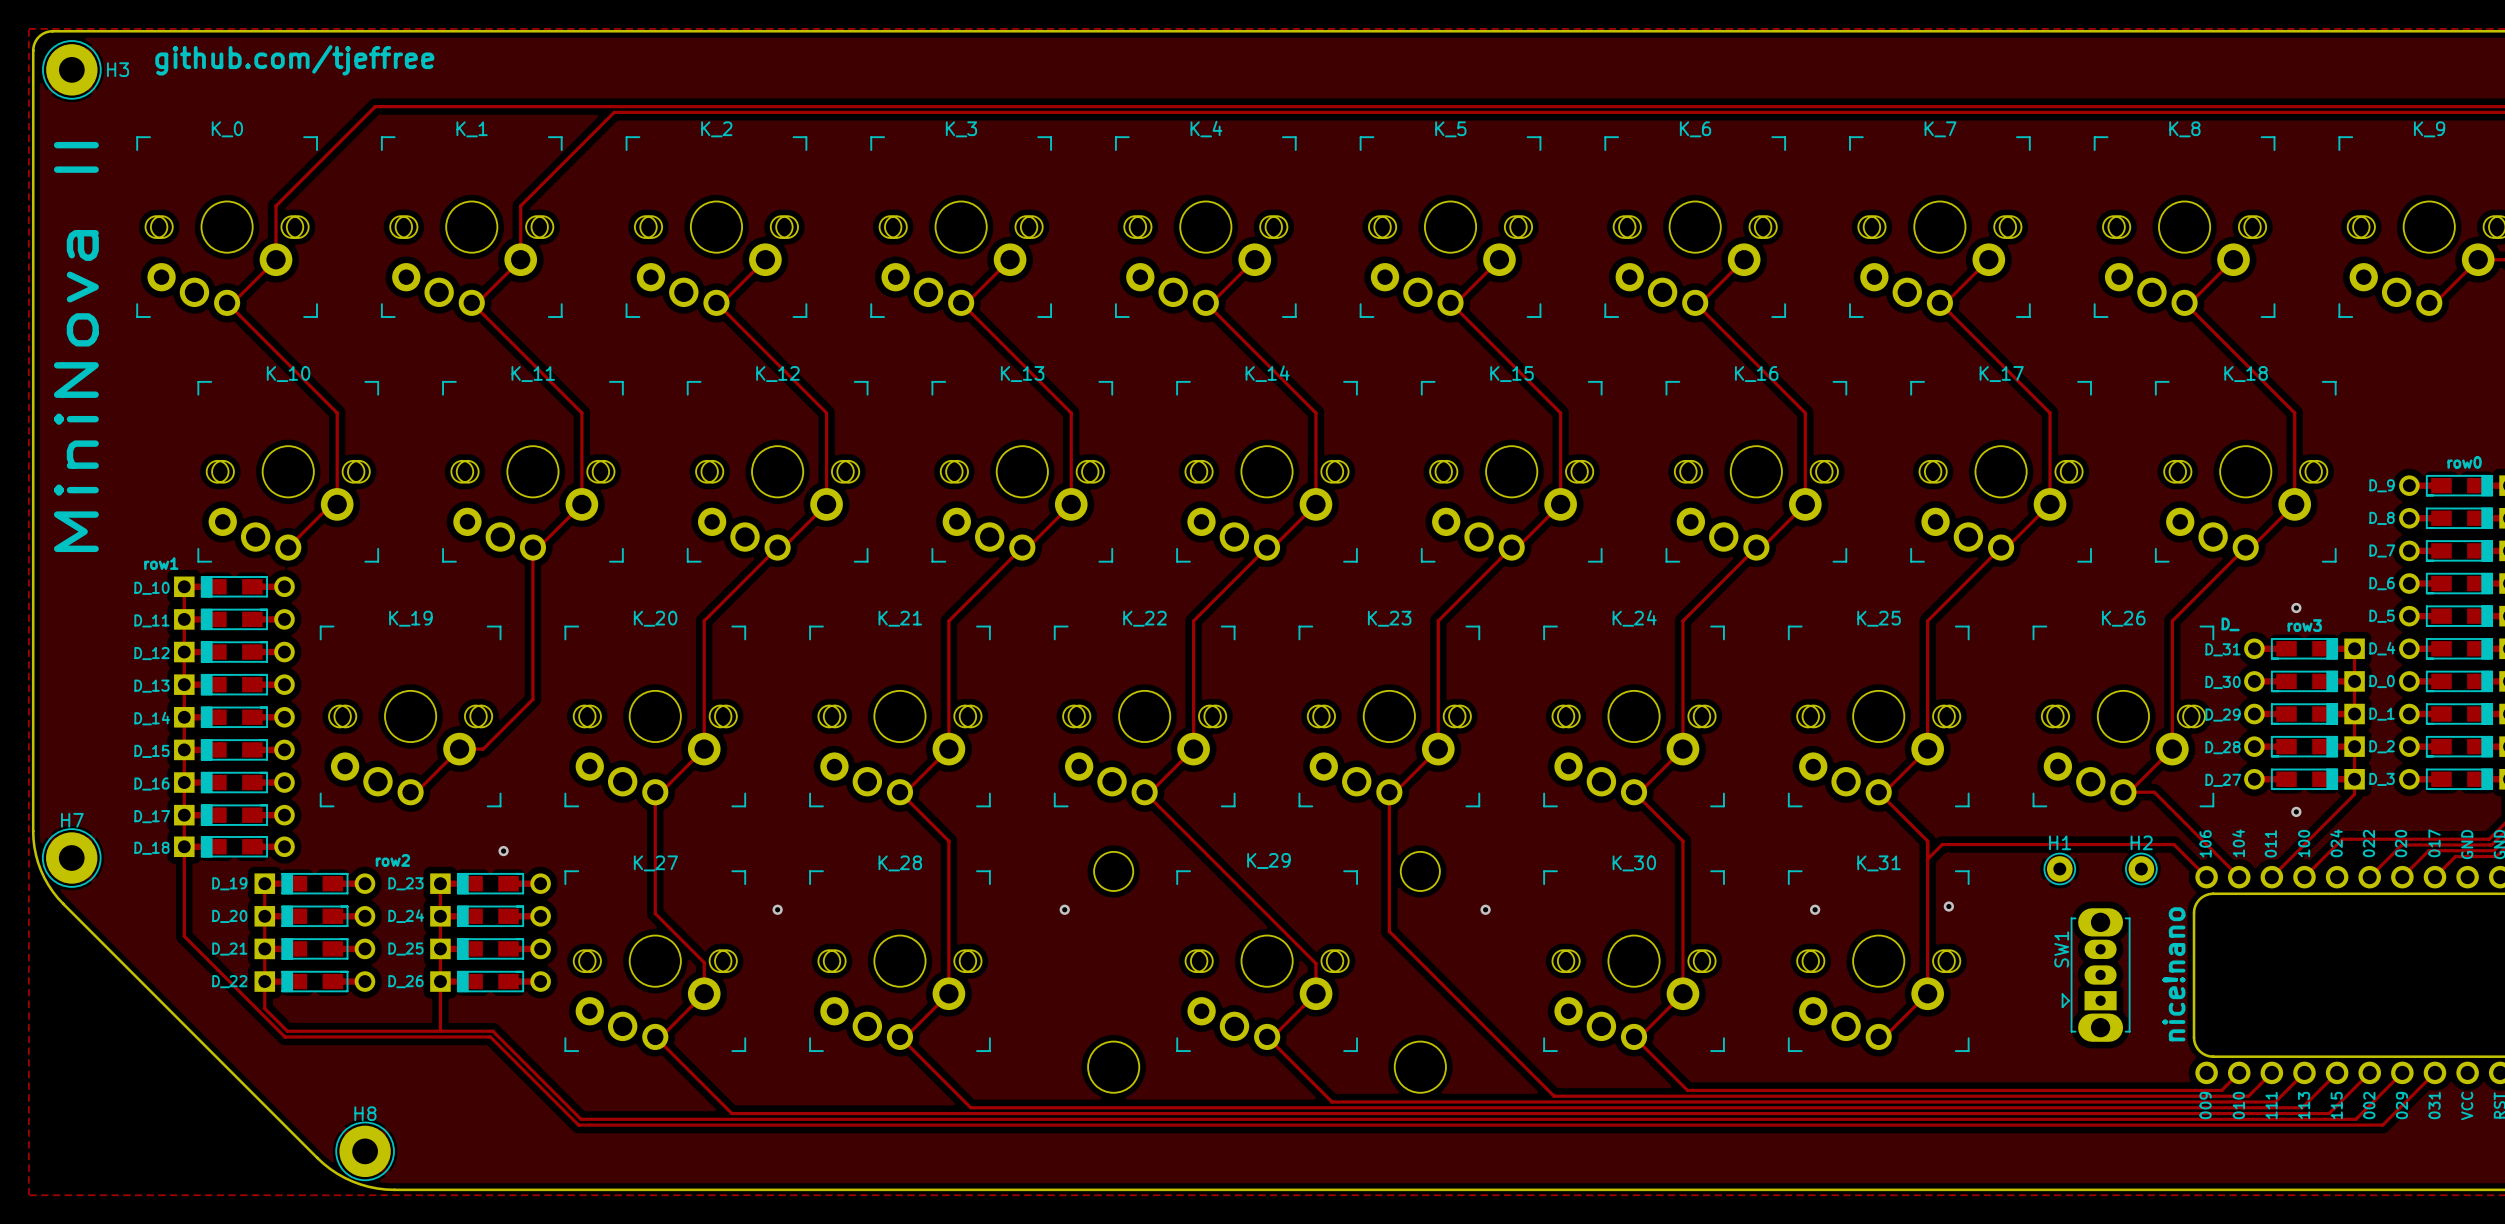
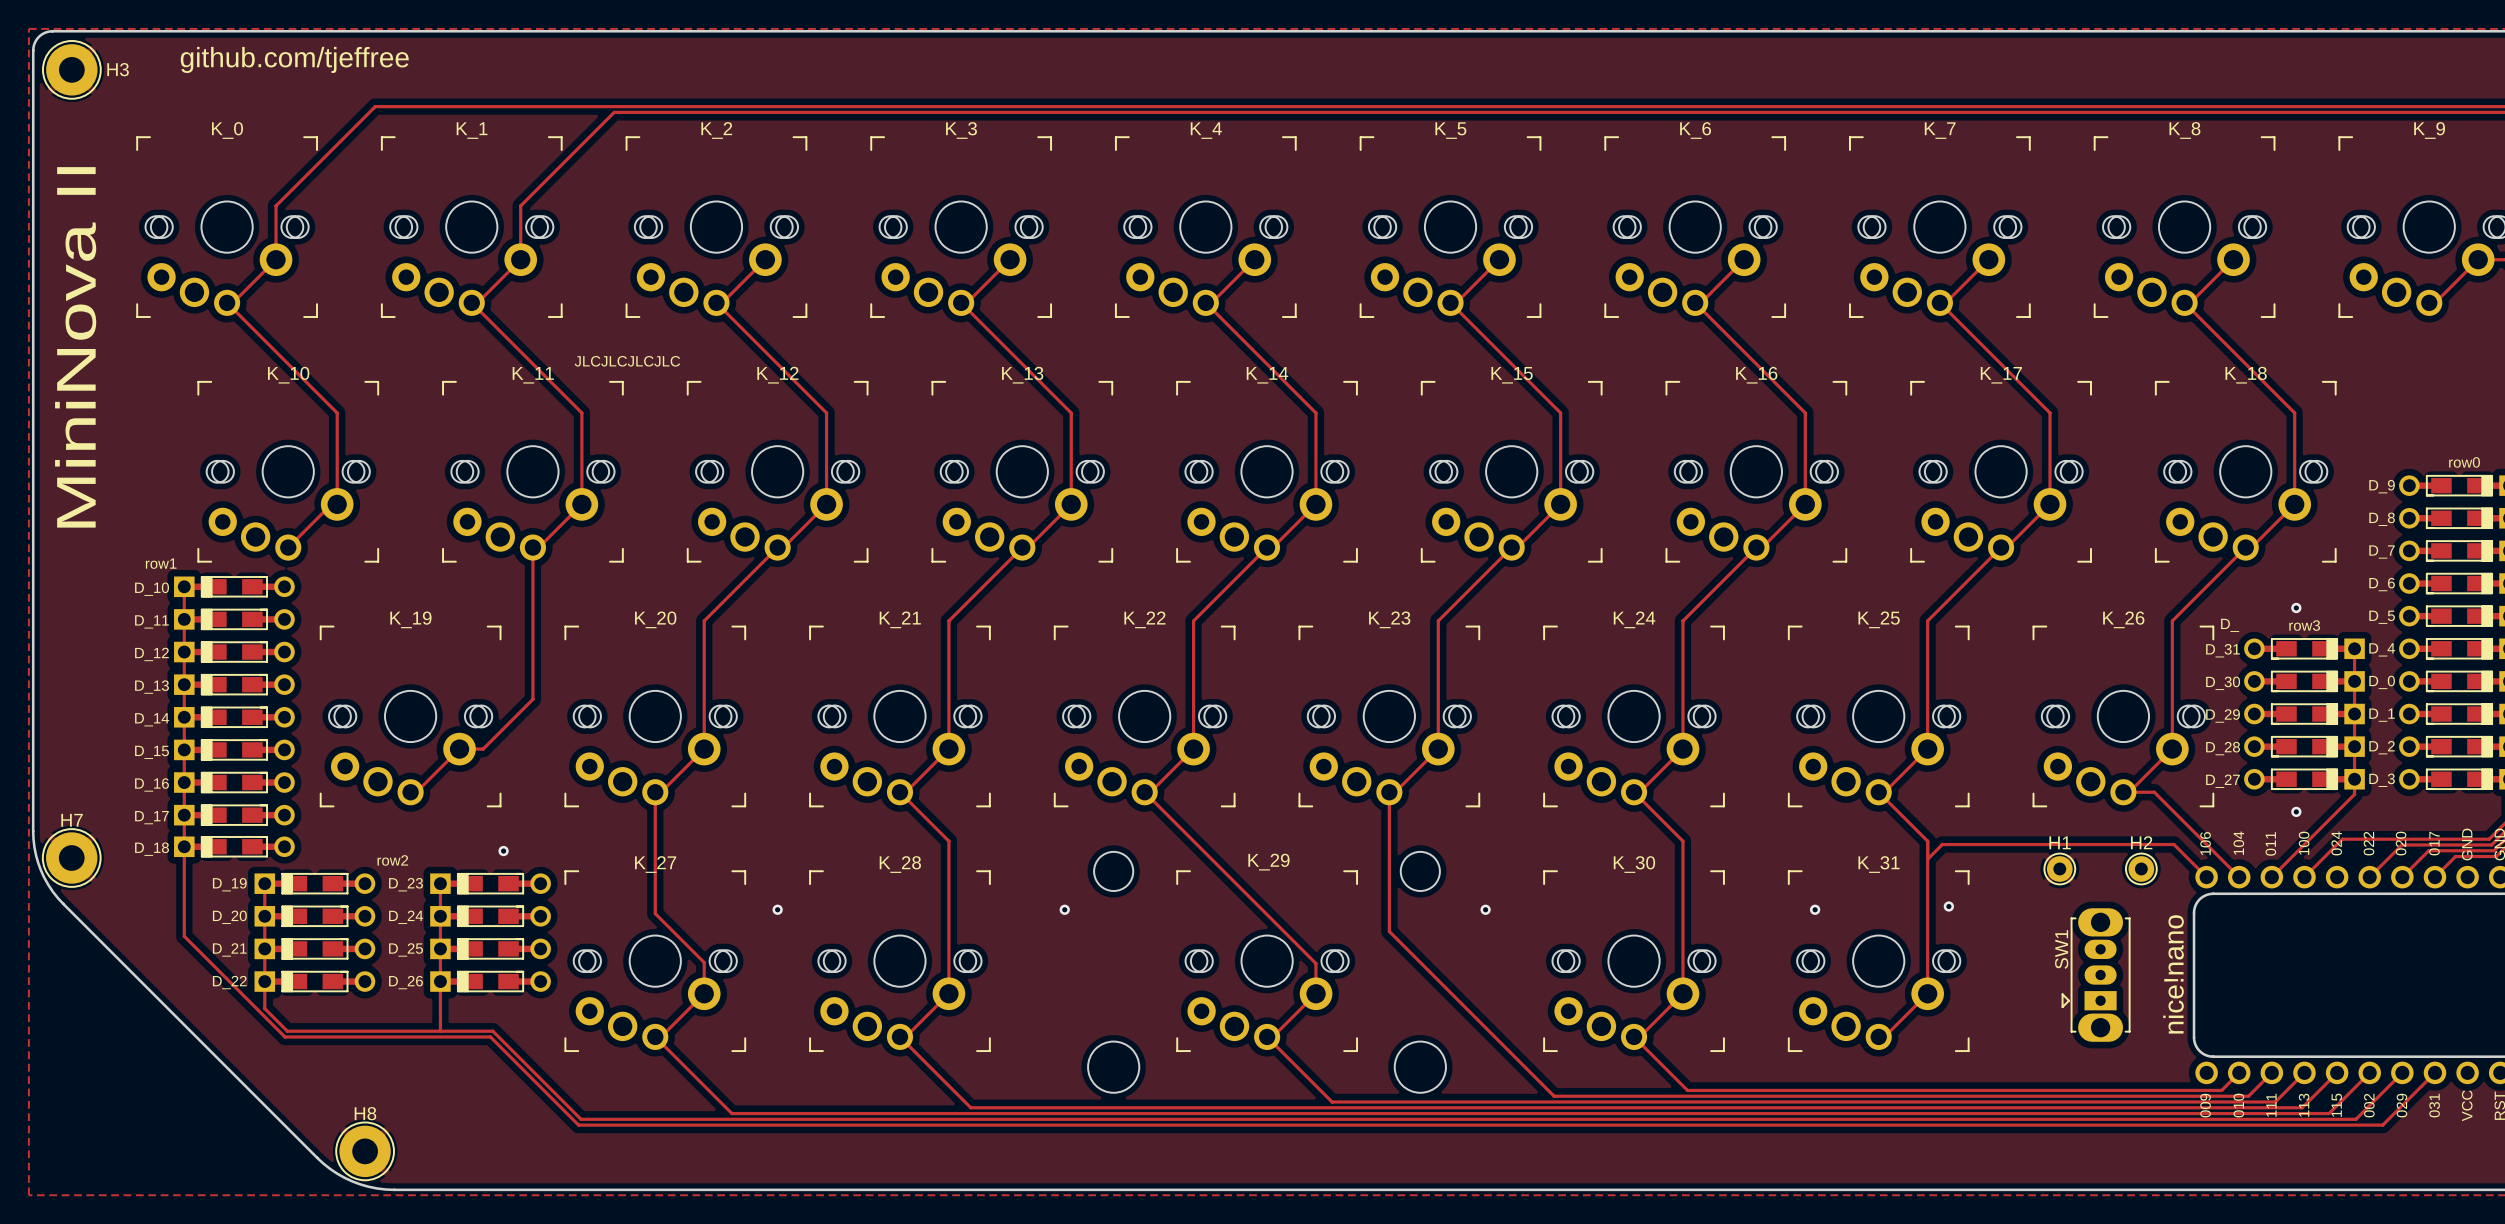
text: none -> JLCJLCJLCJLC (627, 361)

